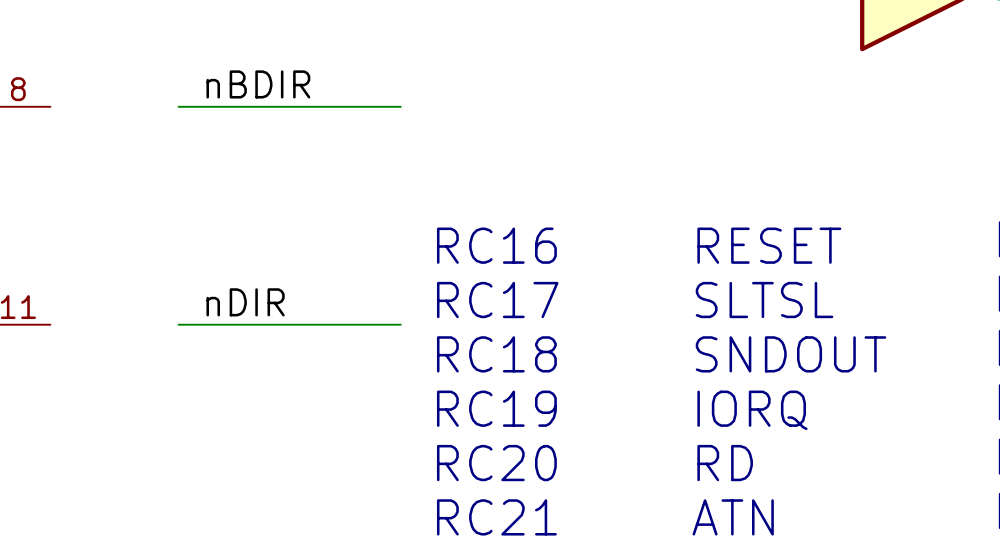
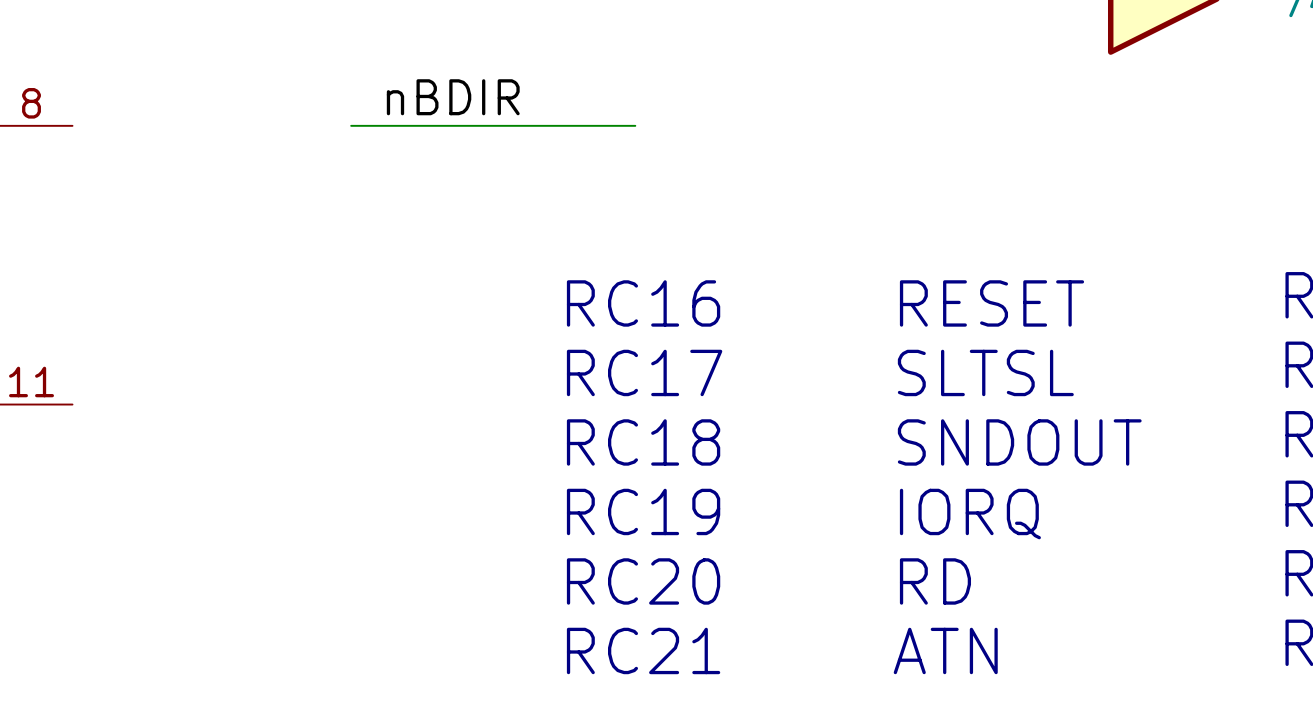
label position: nBDIR (258, 84) -> nBDIR (453, 97)
wire: (178, 106) (268, 106) -> (520, 125) (635, 125)
label: nDIR (245, 302) -> none
wire: (178, 324) (400, 324) -> none

